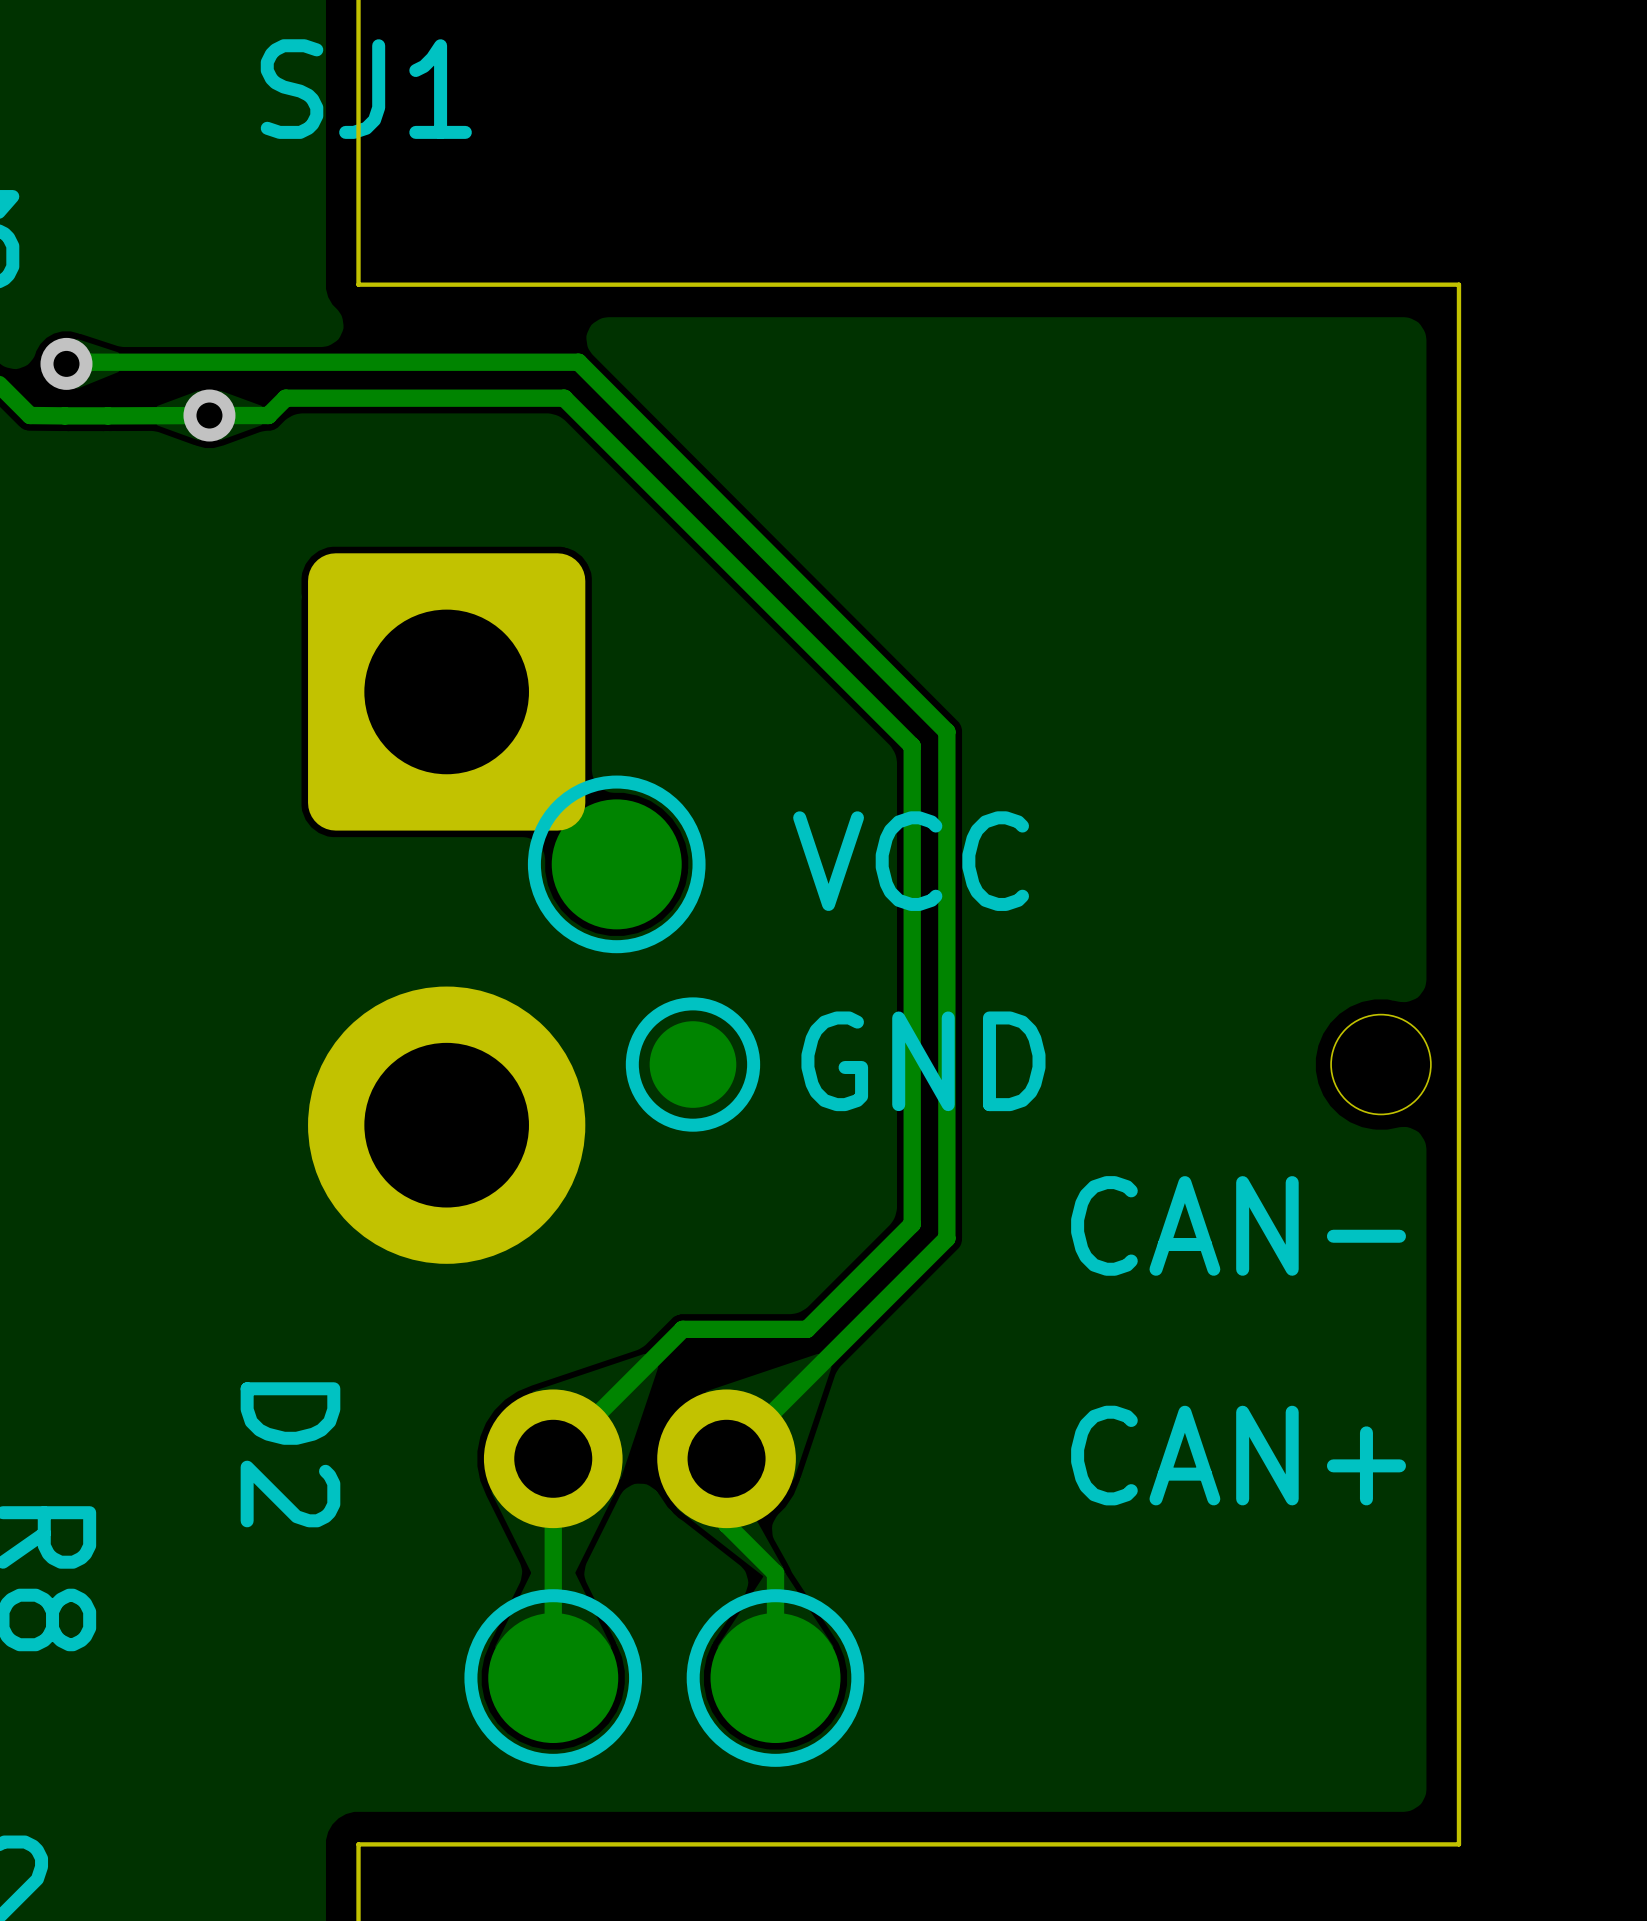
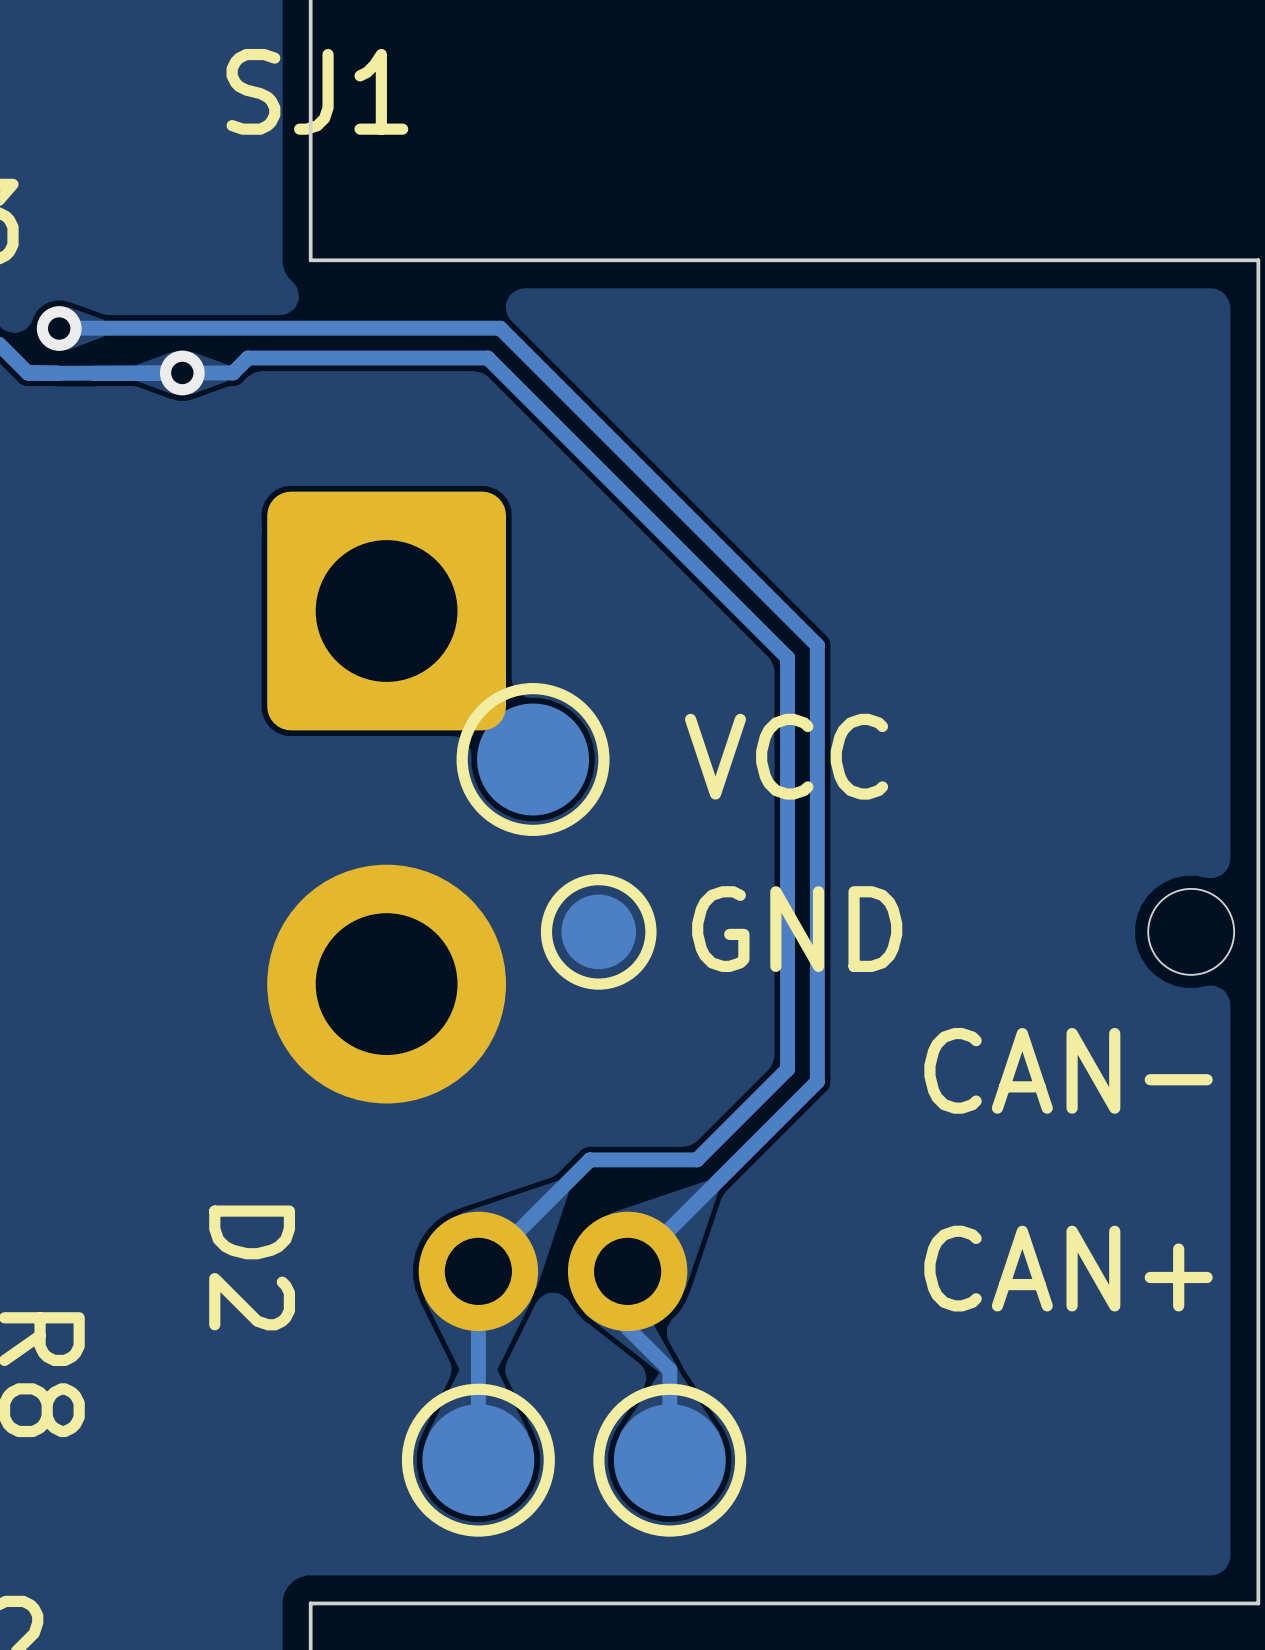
track: (66, 363) (89, 362) (578, 362) (946, 731) -> (76, 328) (500, 328) (817, 645)

